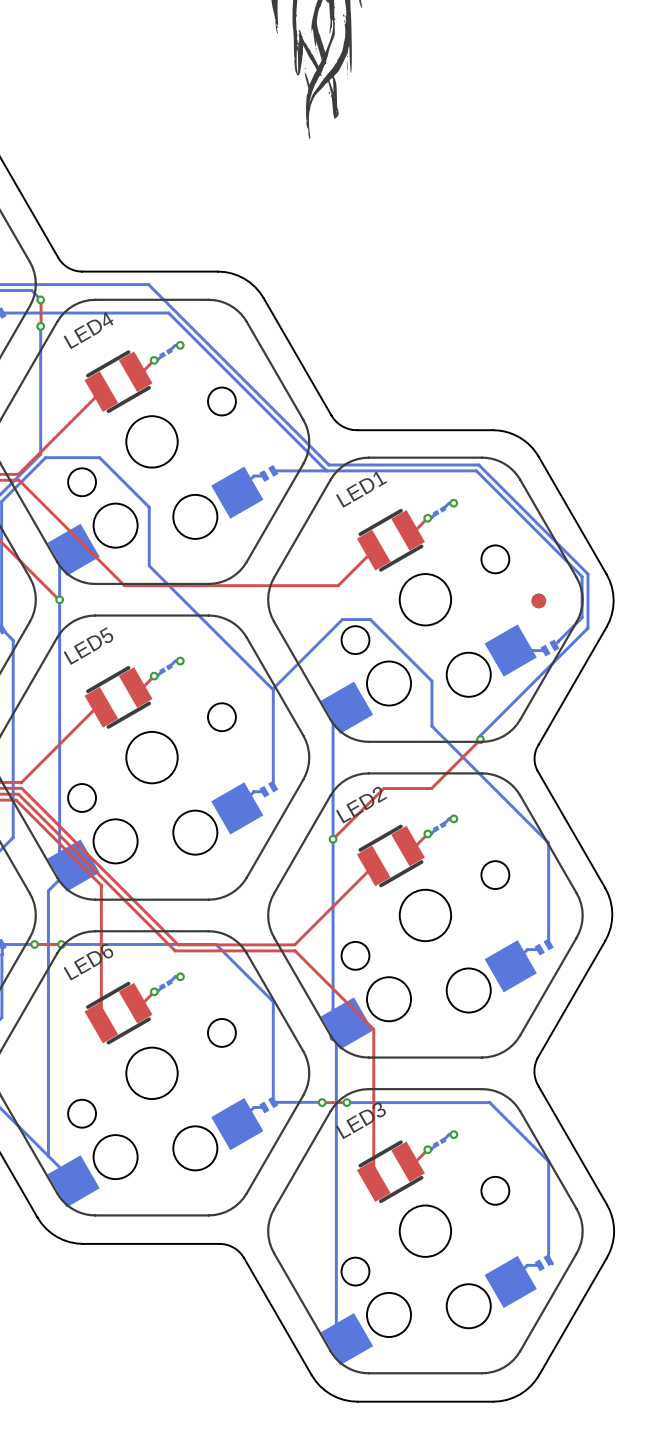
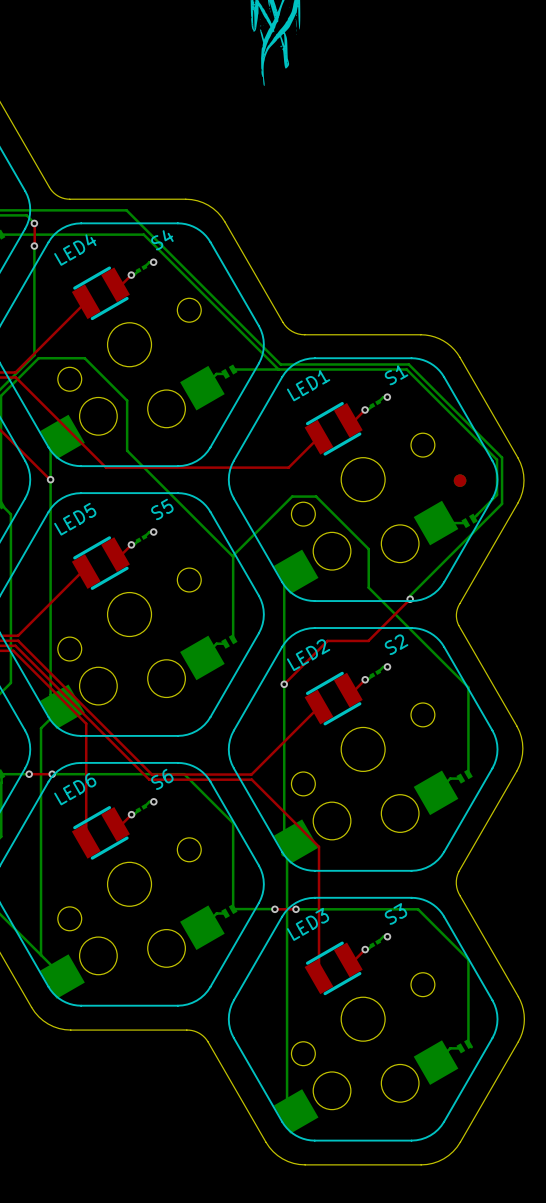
S4 name: none -> S4 (162, 240)
S1 name: none -> S1 (396, 375)
S5 name: none -> S5 (162, 509)
S2 name: none -> S2 (396, 644)
S6 name: none -> S6 (162, 779)
S3 name: none -> S3 (395, 913)

